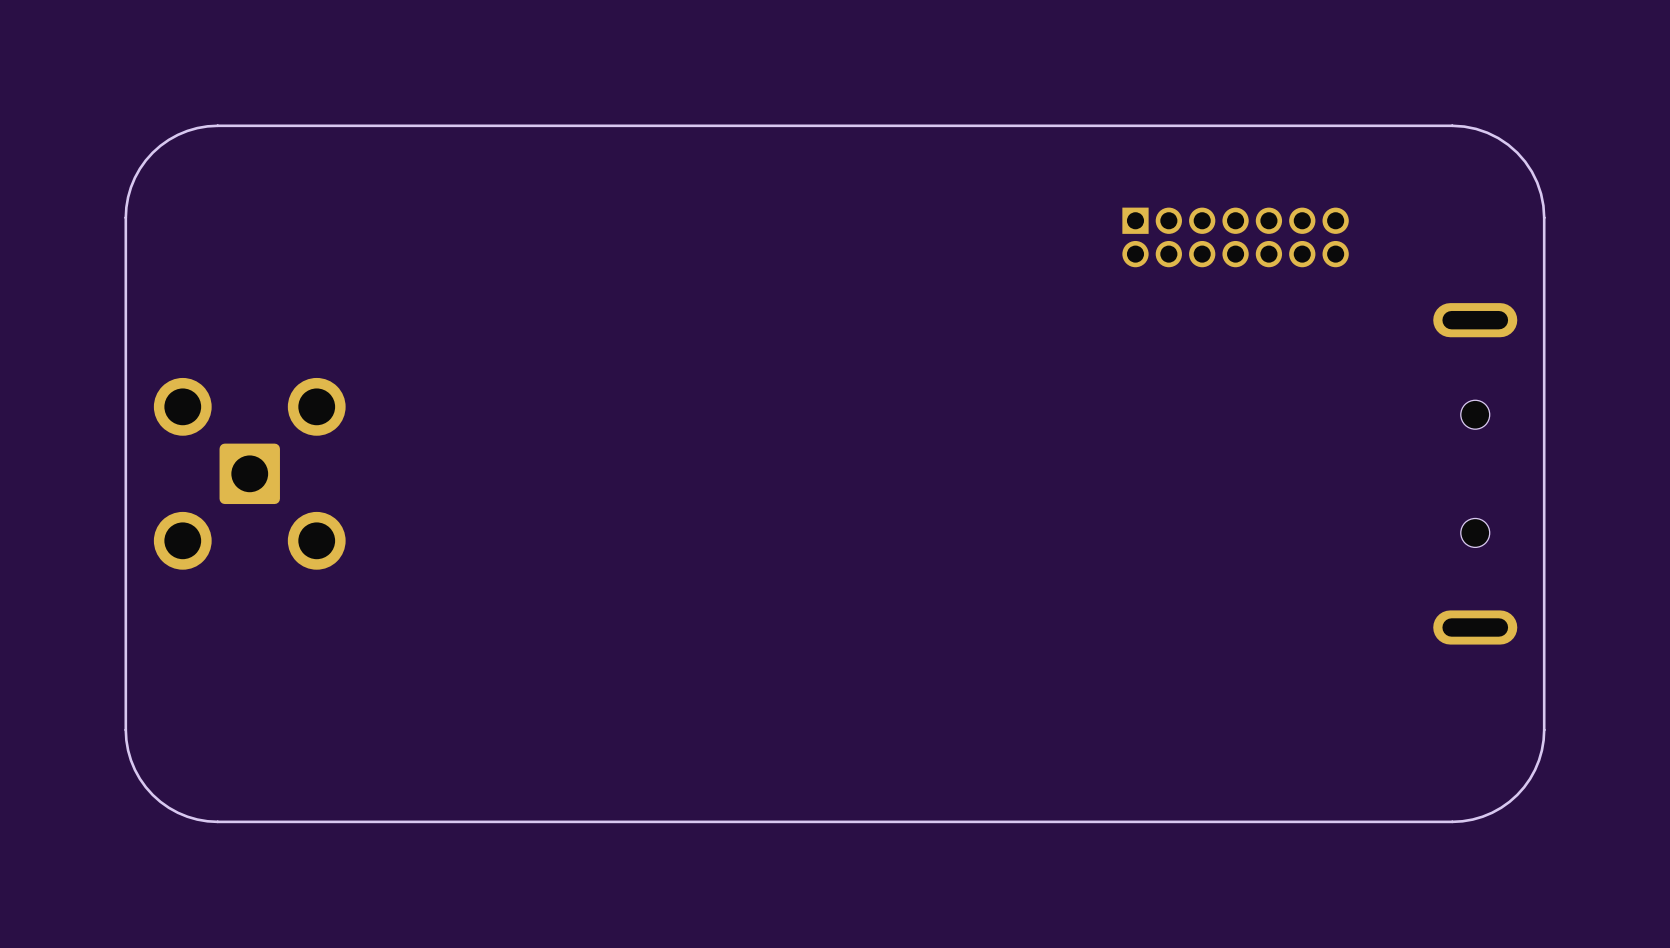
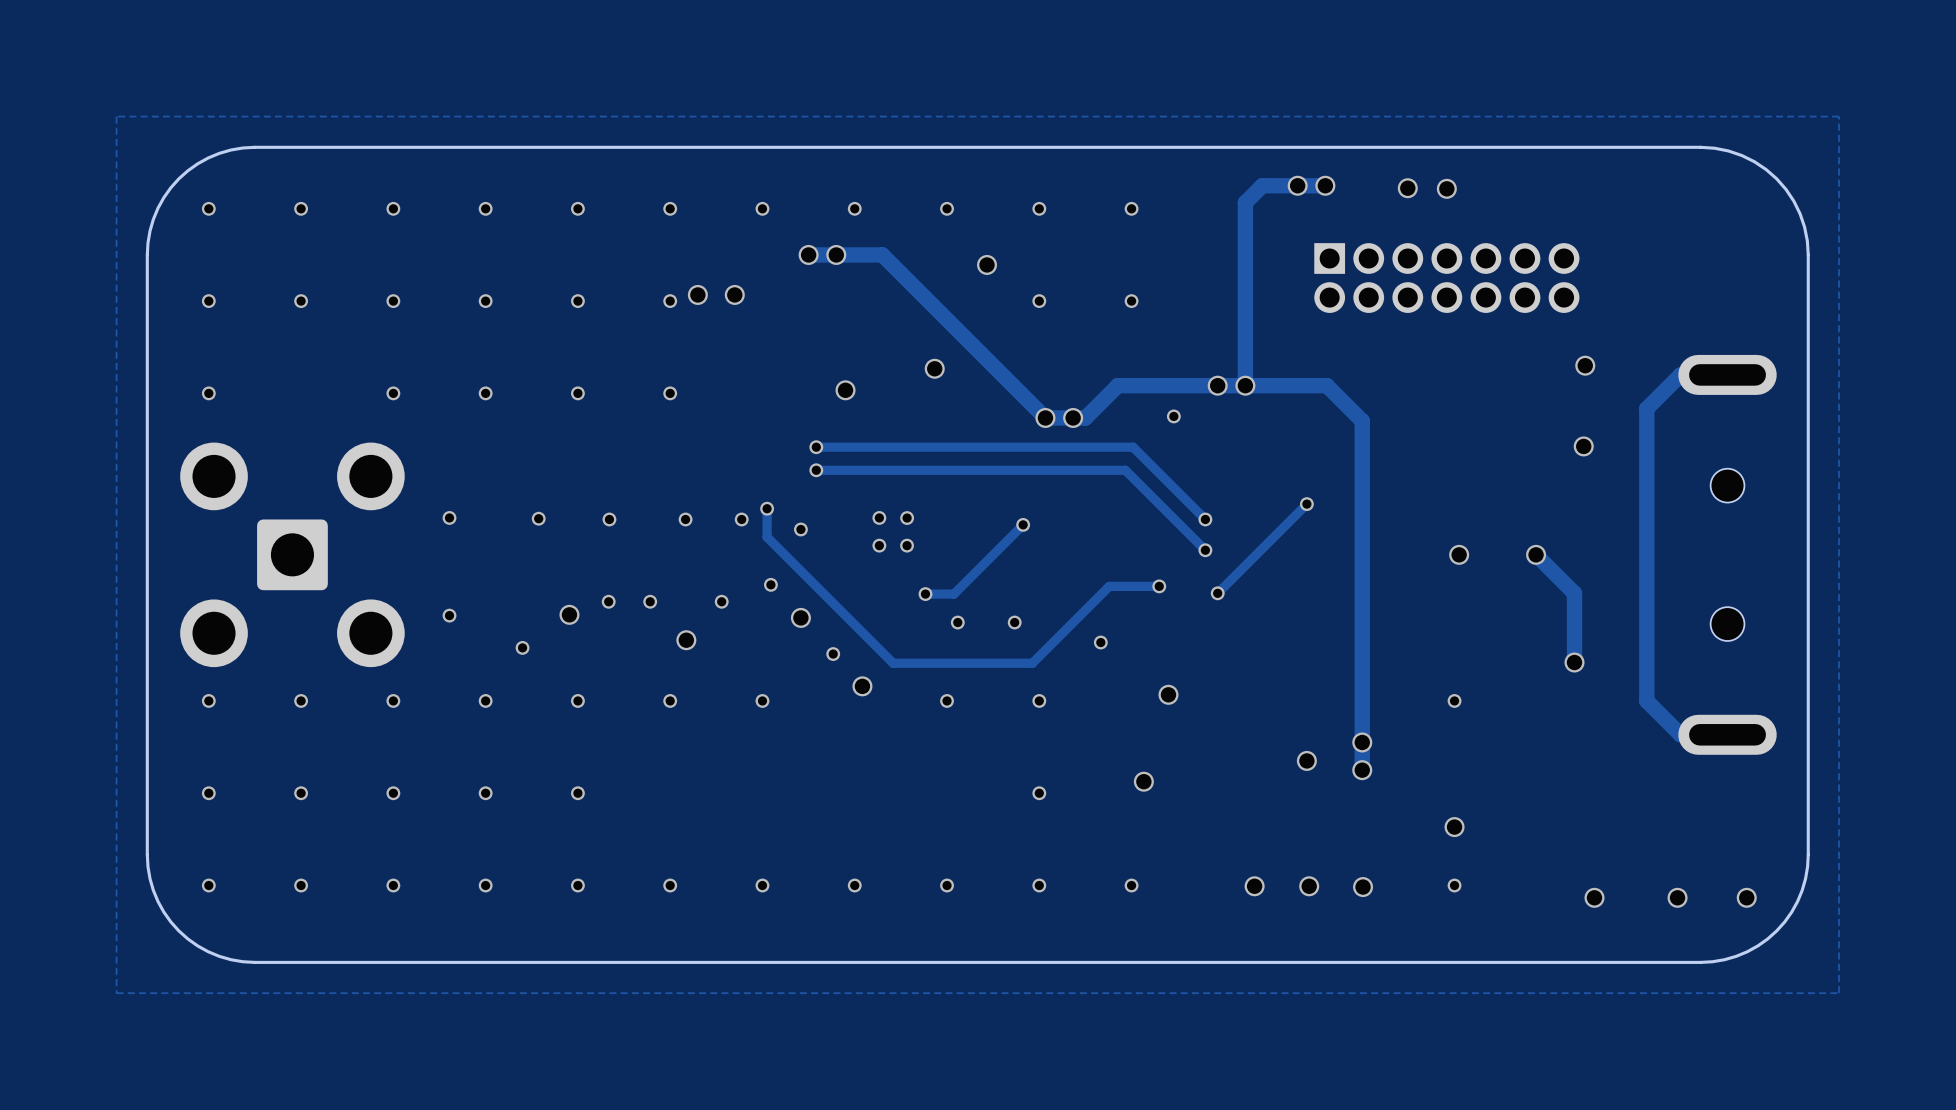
zone outline: none -> (1839, 116) (116, 116) (116, 993) (1839, 993) (1839, 116)
via: none -> (1297, 185)
track: none -> (1325, 185) (1262, 185) (1245, 202) (1245, 385)
via: none -> (1325, 185)
via: none -> (1407, 188)
via: none -> (1446, 188)
via: none -> (208, 208)
via: none -> (301, 208)
via: none -> (393, 208)
via: none -> (485, 208)
via: none -> (577, 208)
via: none -> (670, 208)
via: none -> (762, 208)
via: none -> (854, 208)
via: none -> (947, 208)
via: none -> (1039, 208)
via: none -> (1131, 208)
track: none -> (808, 254) (882, 254) (1045, 417) (1085, 417) (1117, 385) (1326, 385) (1362, 421) (1362, 770)
via: none -> (808, 254)
via: none -> (836, 254)
via: none -> (987, 264)
via: none -> (697, 294)
via: none -> (734, 294)
via: none -> (208, 301)
via: none -> (301, 301)
via: none -> (393, 301)
via: none -> (485, 301)
via: none -> (577, 301)
via: none -> (670, 301)
via: none -> (1039, 301)
via: none -> (1131, 301)
via: none -> (1585, 365)
via: none -> (934, 368)
track: none -> (1727, 374) (1680, 374) (1646, 408) (1646, 700) (1680, 734) (1727, 734)
via: none -> (1217, 385)
via: none -> (1245, 385)
via: none -> (845, 390)
via: none -> (208, 393)
via: none -> (393, 393)
via: none -> (485, 393)
via: none -> (577, 393)
via: none -> (670, 393)
via: none -> (1173, 416)
via: none -> (1045, 417)
via: none -> (1073, 417)
track: none -> (816, 447) (1133, 447) (1205, 519)
via: none -> (816, 447)
via: none -> (1583, 446)
track: none -> (816, 470) (1125, 470) (1205, 550)
via: none -> (816, 470)
track: none -> (1306, 504) (1217, 593)
via: none -> (1306, 504)
track: none -> (767, 508) (767, 537) (893, 663) (1032, 663) (1109, 586) (1159, 586)
via: none -> (767, 508)
via: none -> (449, 517)
via: none -> (538, 518)
via: none -> (879, 517)
via: none -> (907, 518)
via: none -> (609, 519)
via: none -> (685, 519)
via: none -> (741, 519)
via: none -> (1205, 519)
track: none -> (1023, 524) (953, 594) (925, 594)
via: none -> (1023, 524)
via: none -> (800, 529)
via: none -> (879, 545)
via: none -> (907, 545)
via: none -> (1205, 550)
via: none -> (1459, 554)
track: none -> (1536, 554) (1574, 593) (1574, 662)
via: none -> (1536, 554)
via: none -> (770, 584)
via: none -> (1159, 586)
via: none -> (1217, 593)
via: none -> (925, 594)
via: none -> (608, 601)
via: none -> (650, 601)
via: none -> (721, 601)
via: none -> (449, 615)
via: none -> (569, 614)
via: none -> (800, 617)
via: none -> (957, 622)
via: none -> (1014, 622)
via: none -> (686, 640)
via: none -> (1100, 642)
via: none -> (522, 647)
via: none -> (833, 654)
via: none -> (1574, 662)
via: none -> (862, 686)
via: none -> (1168, 694)
via: none -> (208, 700)
via: none -> (301, 700)
via: none -> (393, 700)
via: none -> (485, 700)
via: none -> (577, 700)
via: none -> (670, 700)
via: none -> (762, 700)
via: none -> (947, 700)
via: none -> (1039, 700)
via: none -> (1454, 700)
via: none -> (1362, 742)
via: none -> (1306, 760)
via: none -> (1362, 770)
via: none -> (1143, 781)
via: none -> (208, 793)
via: none -> (301, 793)
via: none -> (393, 793)
via: none -> (485, 793)
via: none -> (577, 793)
via: none -> (1039, 793)
via: none -> (1454, 827)
via: none -> (208, 885)
via: none -> (301, 885)
via: none -> (393, 885)
via: none -> (485, 885)
via: none -> (577, 885)
via: none -> (670, 885)
via: none -> (762, 885)
via: none -> (854, 885)
via: none -> (947, 885)
via: none -> (1039, 885)
via: none -> (1131, 885)
via: none -> (1254, 886)
via: none -> (1309, 886)
via: none -> (1454, 885)
via: none -> (1363, 887)
via: none -> (1594, 897)
via: none -> (1677, 897)
via: none -> (1746, 897)

